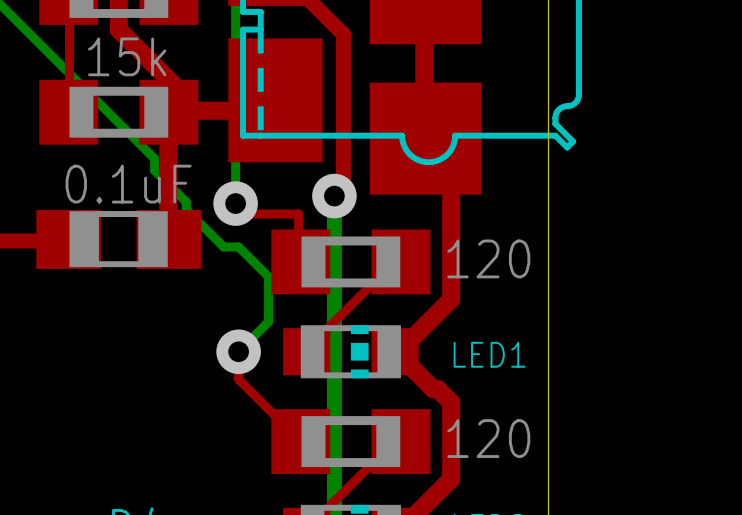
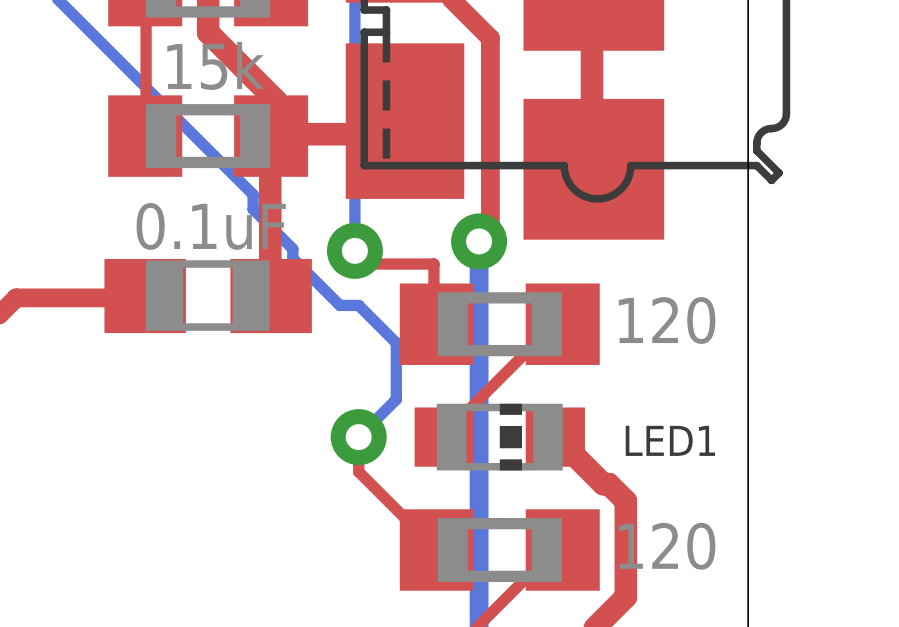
top track: (425, 138) (428, 146) (451, 169) (451, 299) (401, 348) (395, 351) -> none

